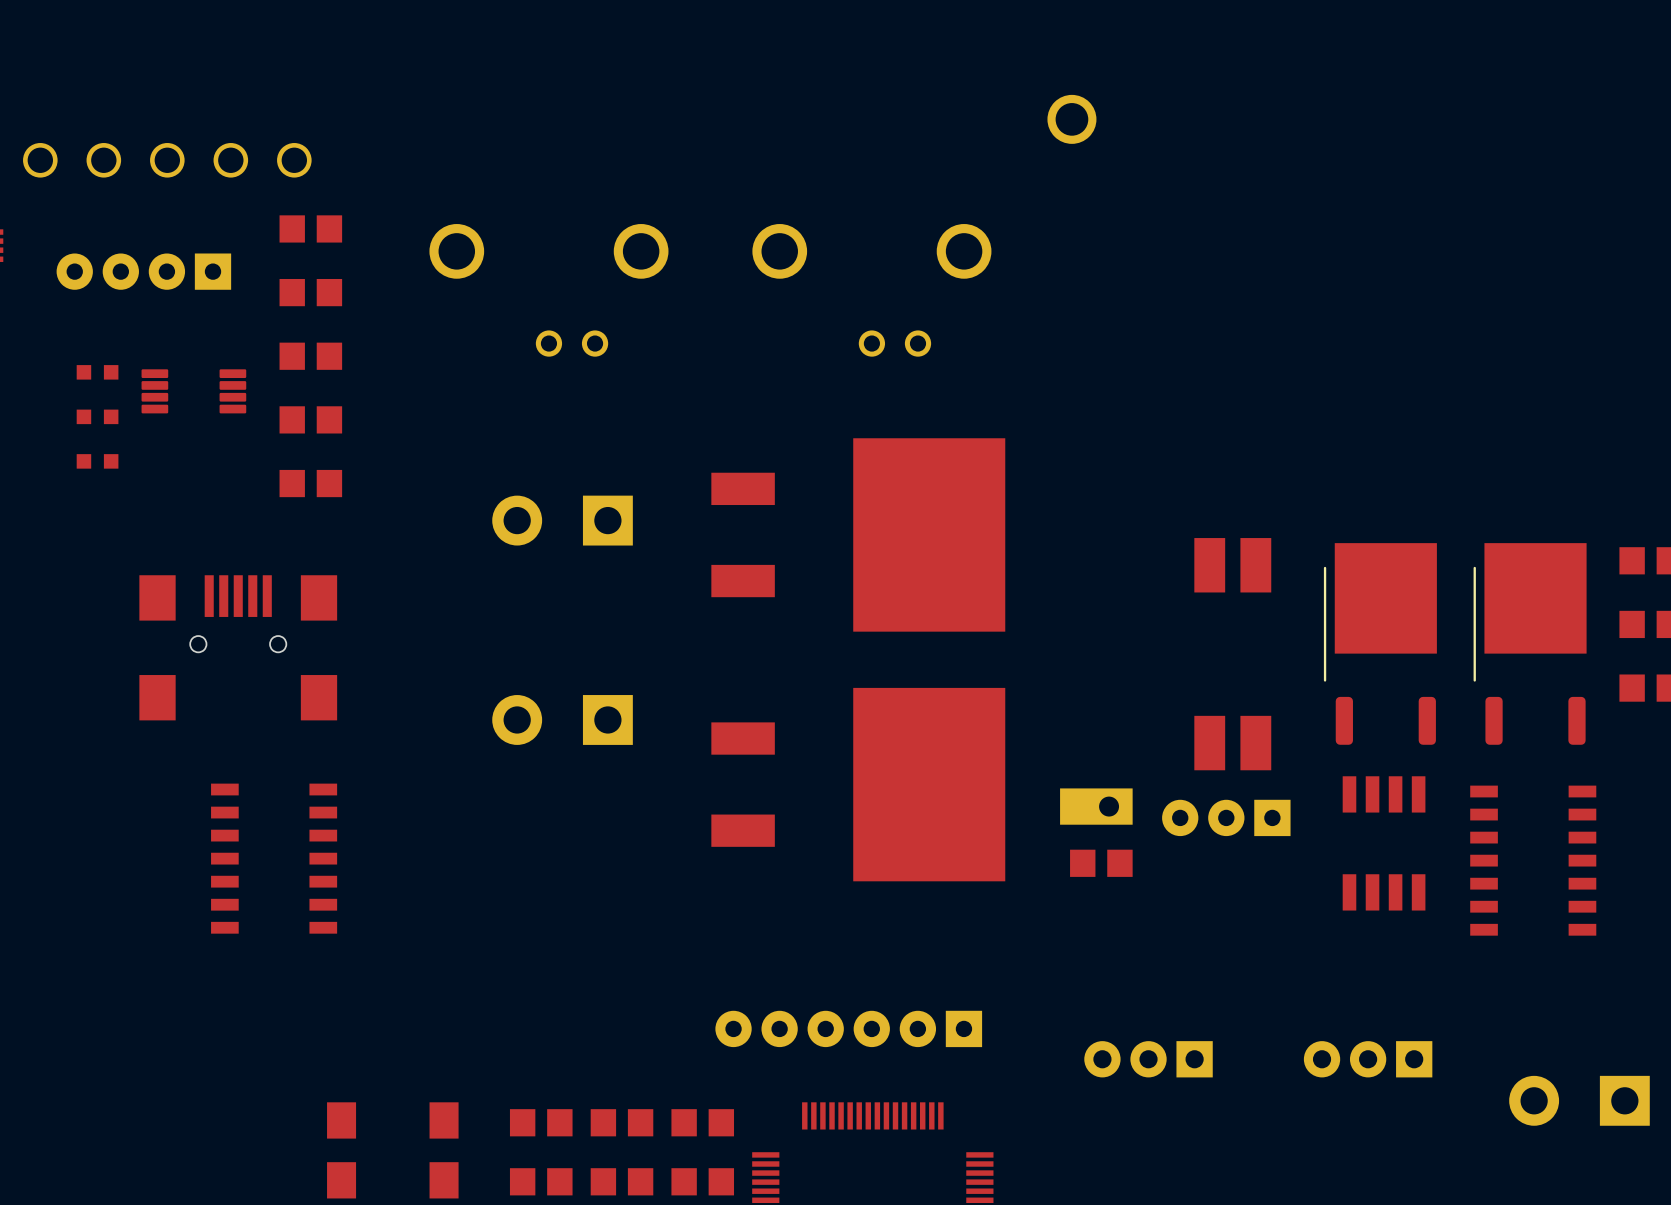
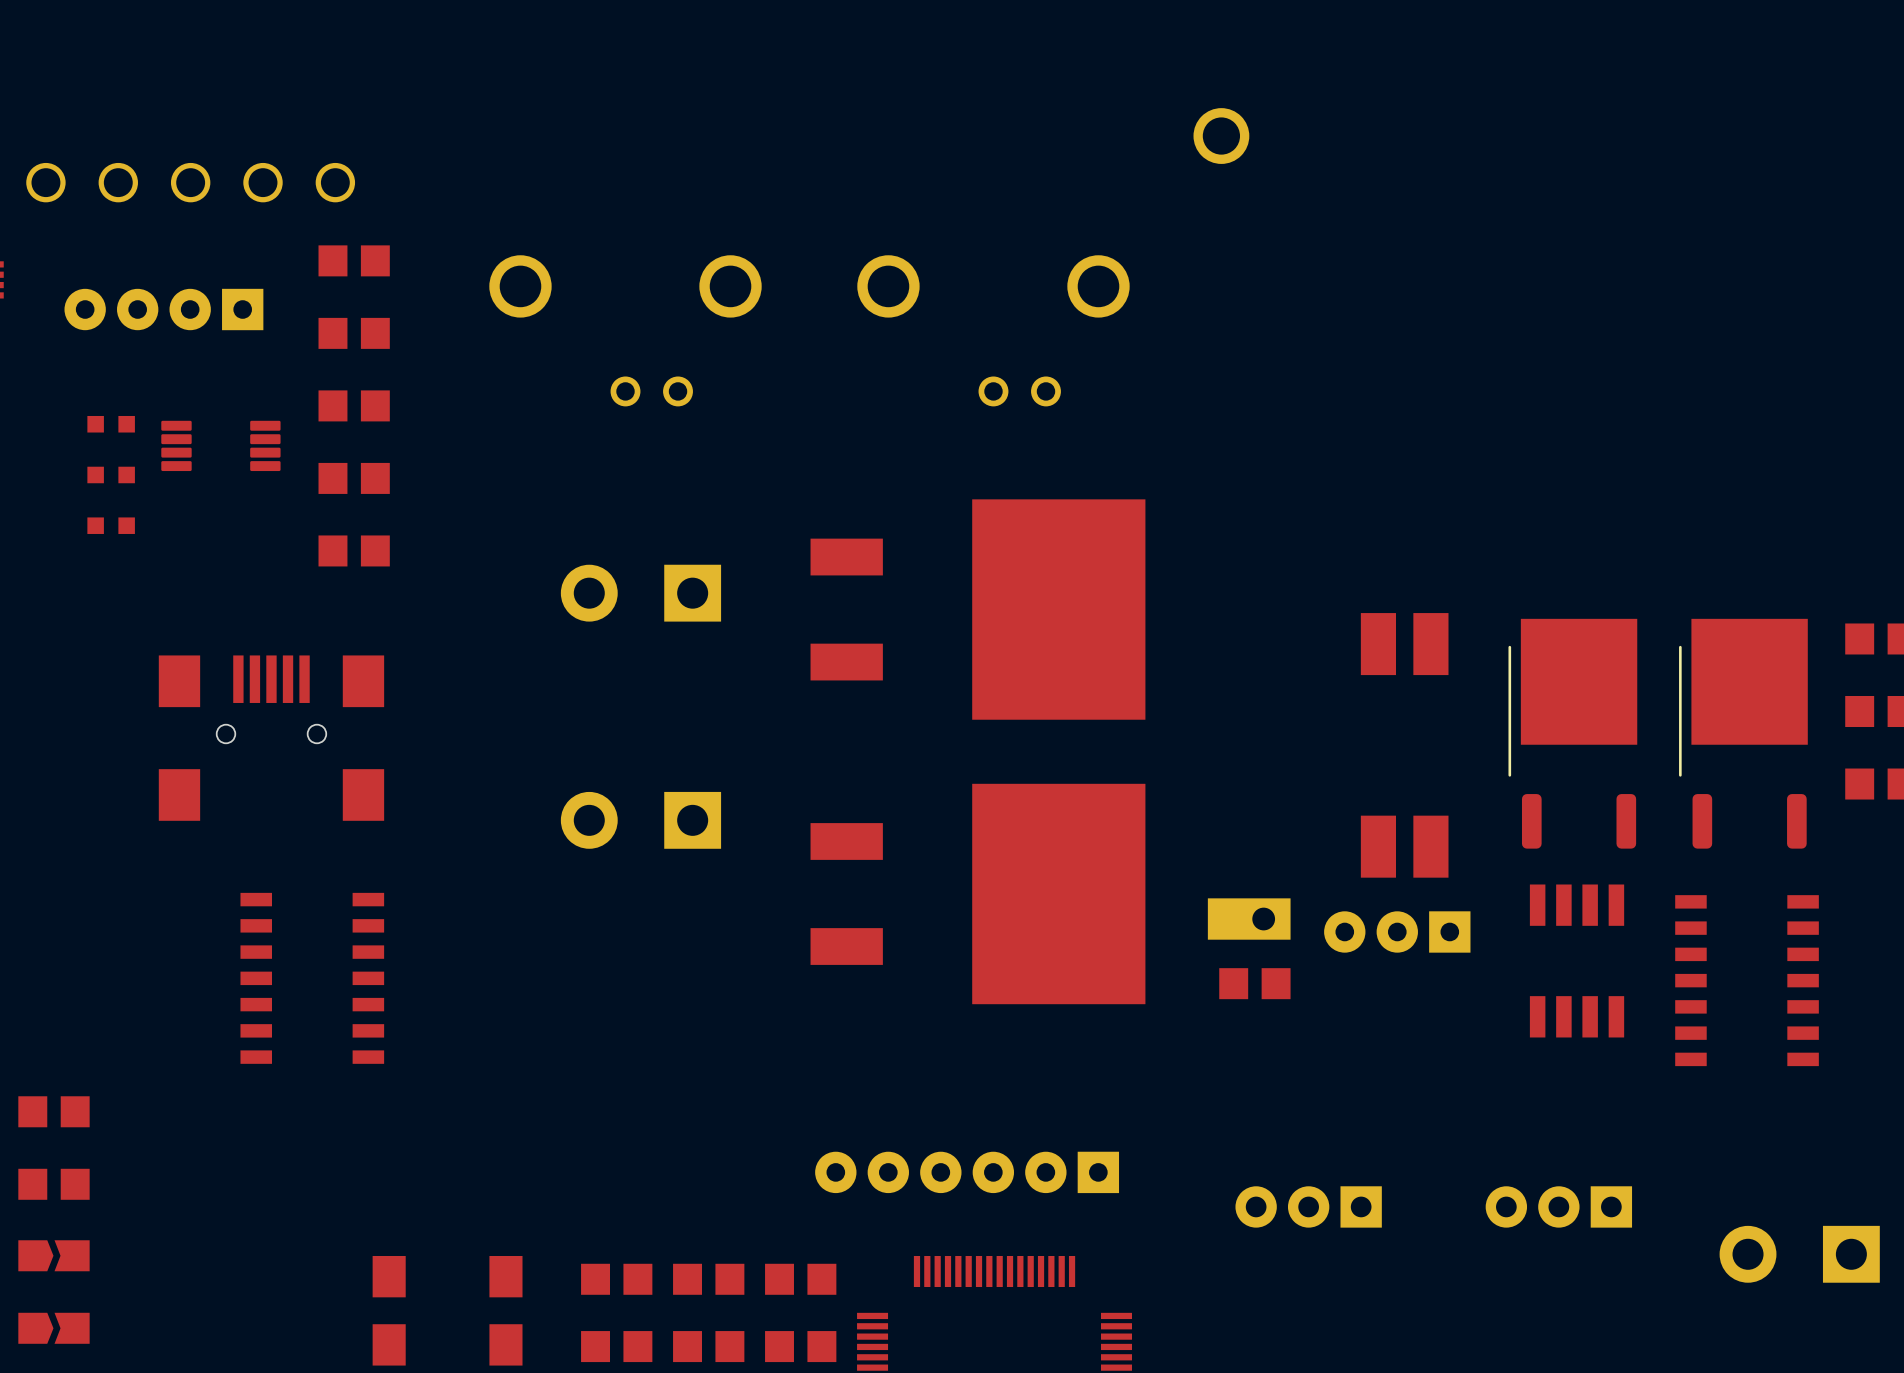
part: none -> (53, 1111)
part: none -> (53, 1184)
part: none -> (53, 1255)
part: none -> (53, 1328)

